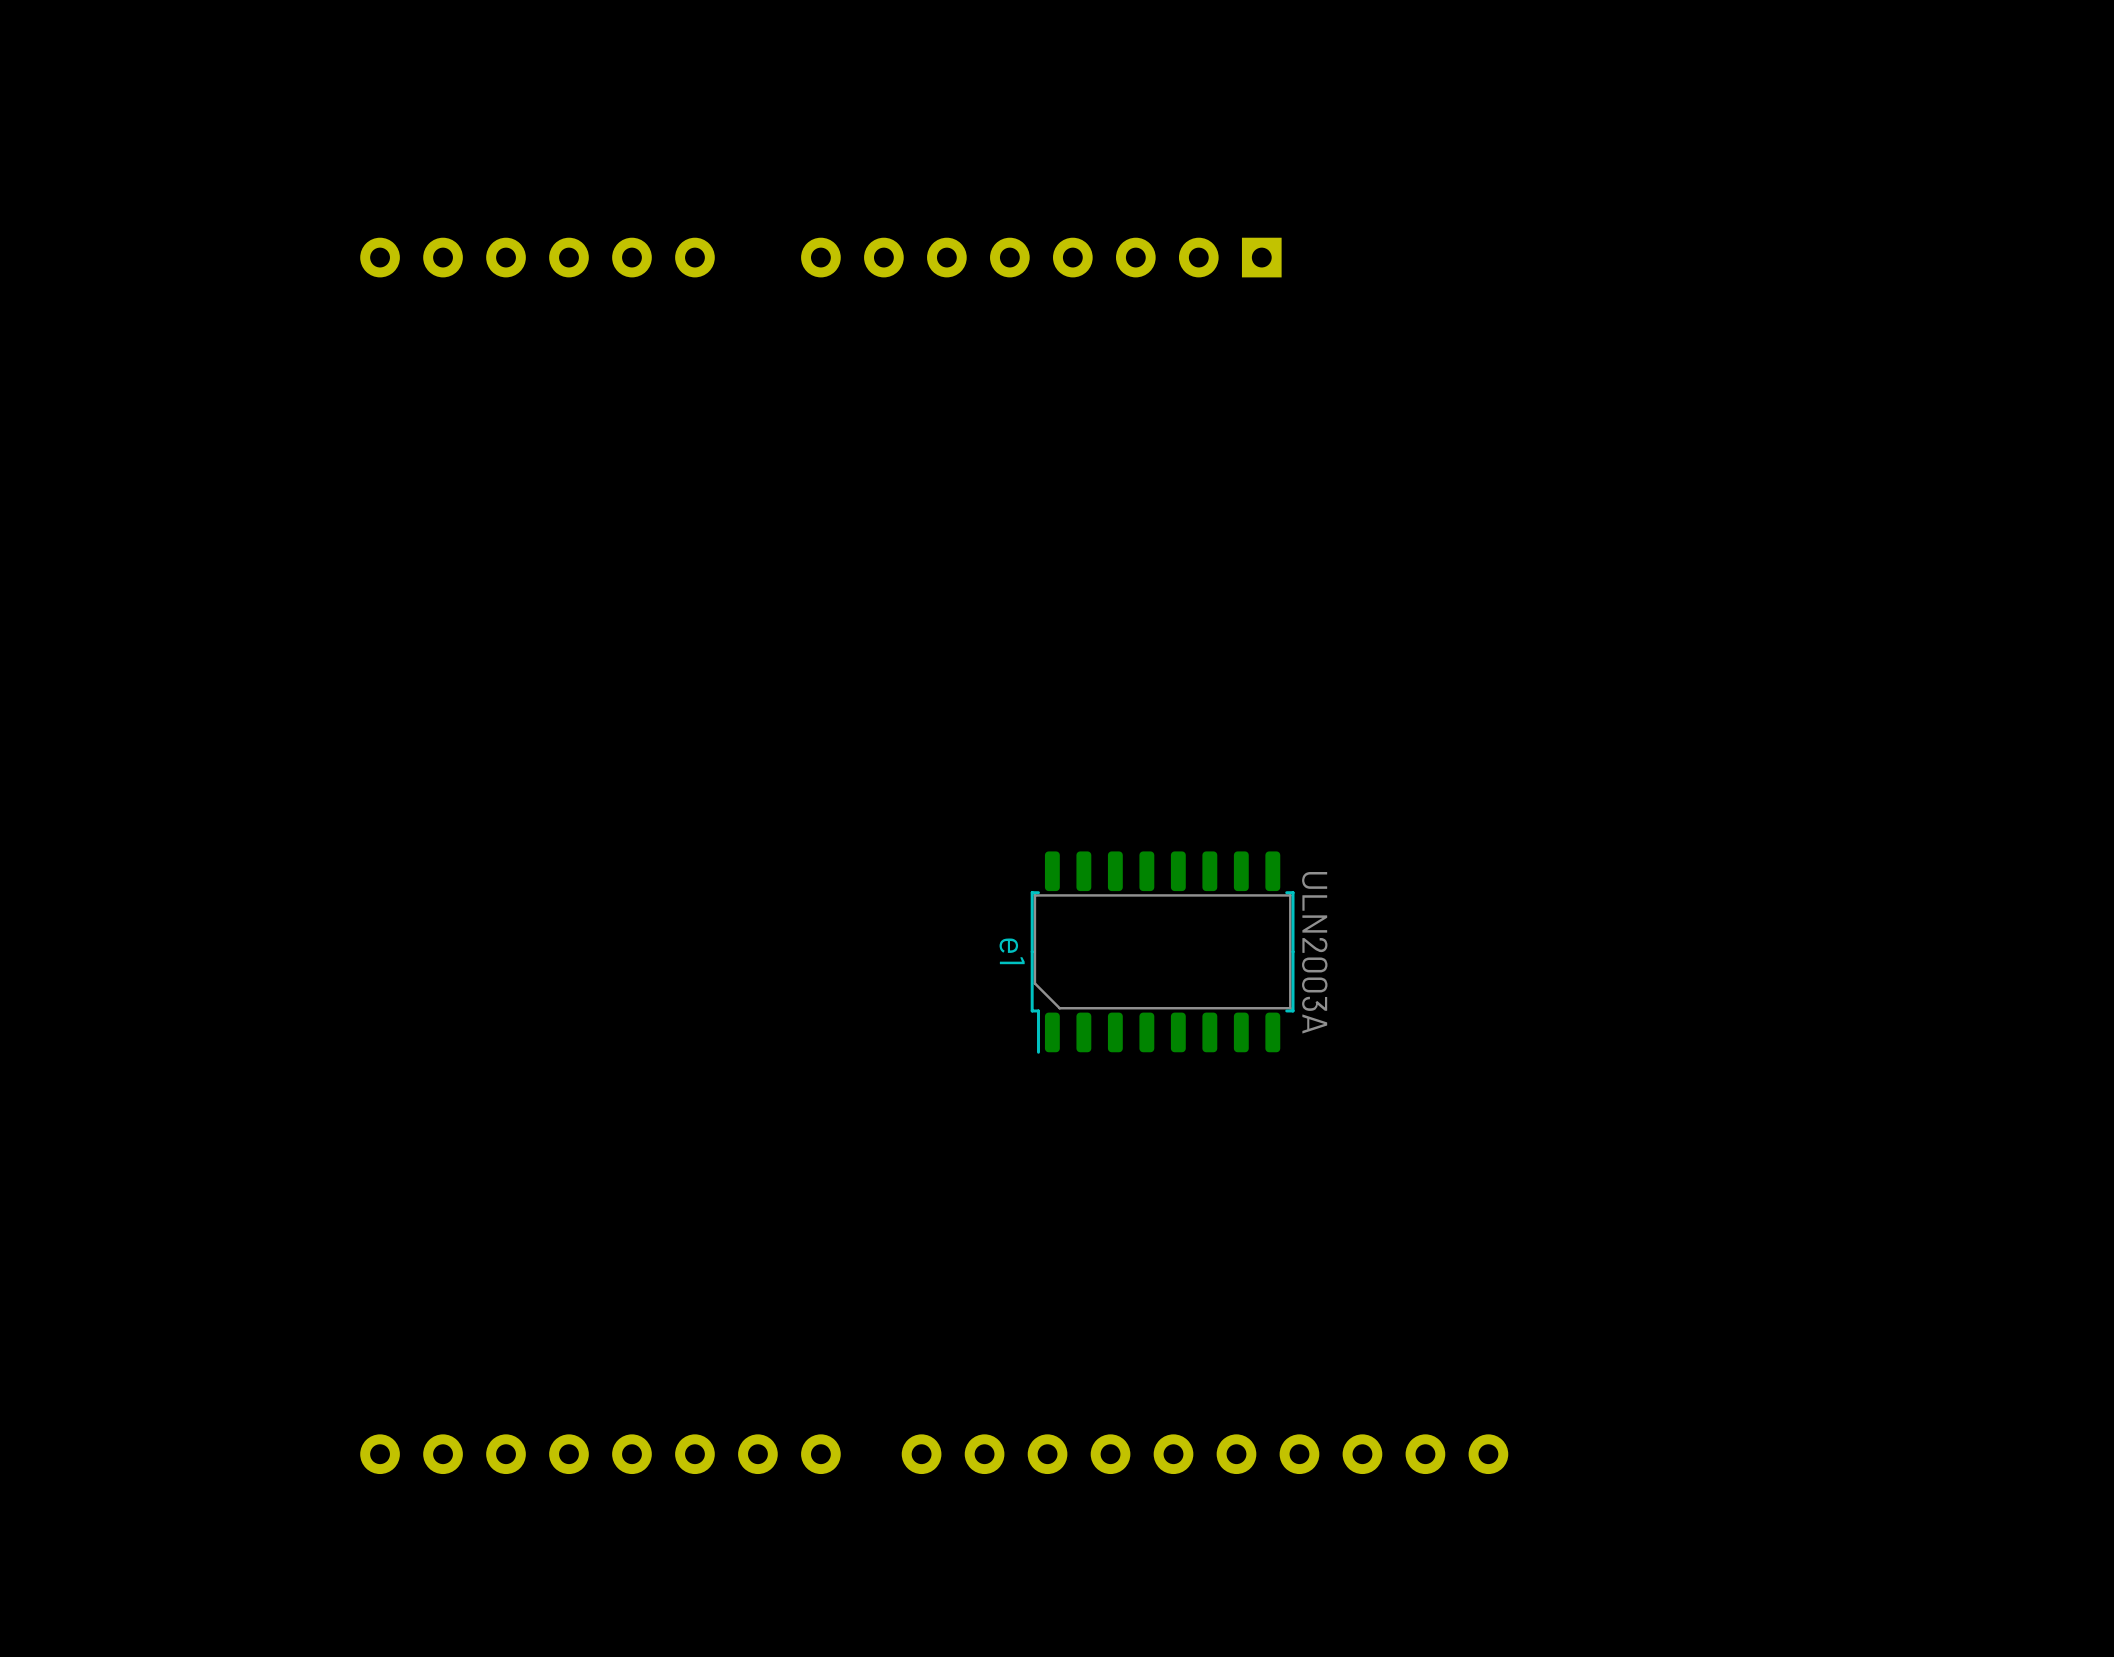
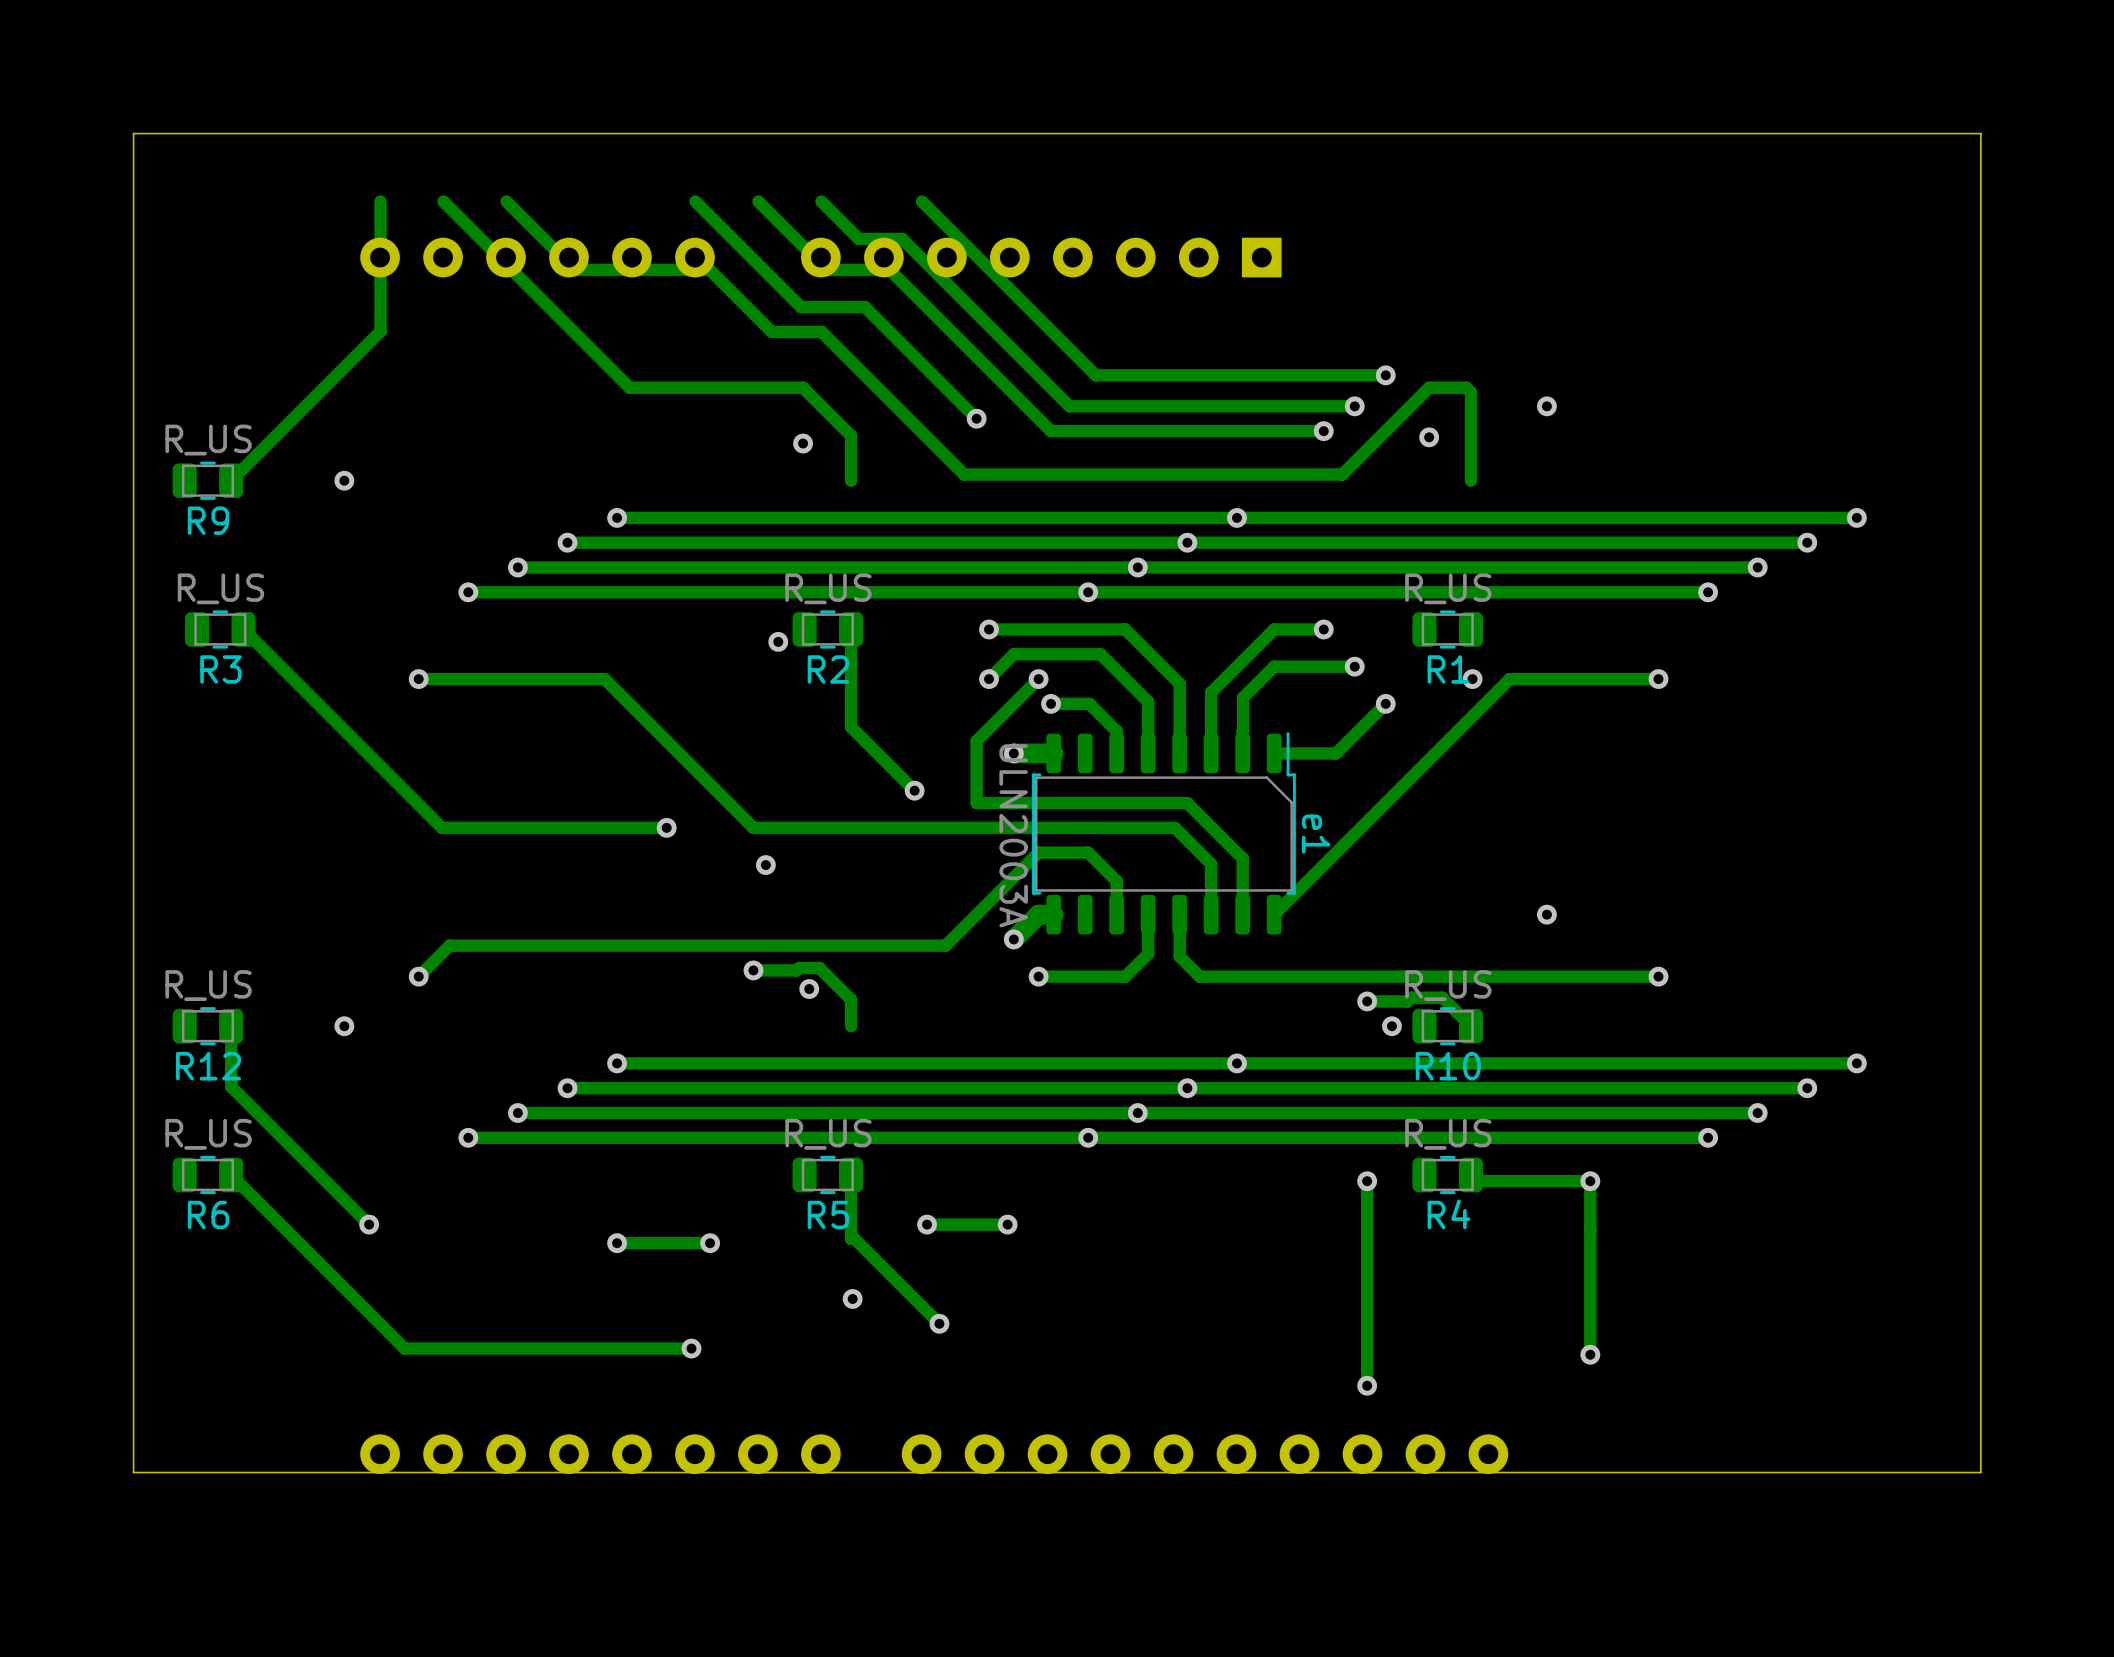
board edge: none -> (1980, 133) (1980, 1472) (133, 1472) (133, 133) (1980, 133)
track: none -> (380, 201) (380, 331) (231, 480)
track: none -> (443, 201) (629, 387) (803, 387) (851, 435) (851, 480)
track: none -> (506, 201) (574, 269) (709, 269) (771, 331) (821, 331) (964, 474) (1342, 474) (1429, 387) (1466, 387) (1470, 392) (1470, 480)
track: none -> (695, 201) (801, 307) (865, 307) (976, 418)
track: none -> (758, 201) (826, 269) (889, 269) (1051, 431) (1323, 431)
track: none -> (821, 201) (858, 238) (902, 238) (1069, 406) (1354, 406)
track: none -> (922, 201) (1095, 375) (1385, 375)
via: none -> (1385, 375)
via: none -> (1354, 406)
via: none -> (1546, 406)
via: none -> (976, 418)
via: none -> (1323, 431)
via: none -> (1429, 437)
via: none -> (803, 443)
R9: none -> R_US (207, 480)
via: none -> (344, 480)
via: none -> (617, 517)
via: none -> (1236, 517)
track: none -> (1856, 517) (617, 517)
via: none -> (1856, 517)
via: none -> (567, 542)
via: none -> (1187, 542)
track: none -> (1807, 542) (567, 542)
via: none -> (1807, 542)
via: none -> (517, 567)
via: none -> (1137, 567)
track: none -> (1757, 567) (517, 567)
via: none -> (1757, 567)
via: none -> (468, 592)
via: none -> (1088, 592)
track: none -> (1708, 592) (468, 592)
via: none -> (1708, 592)
R3: none -> R_US (220, 629)
track: none -> (243, 629) (441, 827) (666, 827)
R2: none -> R_US (827, 629)
track: none -> (851, 629) (851, 727) (914, 790)
track: none -> (989, 629) (1125, 629) (1179, 683) (1179, 753)
via: none -> (989, 629)
track: none -> (1323, 629) (1274, 629) (1211, 692) (1211, 753)
via: none -> (1323, 629)
R1: none -> R_US (1447, 629)
via: none -> (778, 641)
track: none -> (1354, 666) (1274, 666) (1243, 697) (1242, 753)
via: none -> (1354, 666)
track: none -> (418, 679) (604, 679) (753, 827) (1174, 827) (1211, 864) (1211, 914)
via: none -> (418, 679)
track: none -> (989, 679) (1013, 654) (1100, 654) (1148, 701) (1148, 753)
via: none -> (989, 679)
track: none -> (1038, 679) (976, 741) (976, 803) (1187, 803) (1242, 858) (1242, 914)
via: none -> (1038, 679)
via: none -> (1472, 679)
track: none -> (1658, 679) (1509, 679) (1274, 914)
via: none -> (1658, 679)
track: none -> (1051, 703) (1089, 703) (1116, 731) (1116, 753)
via: none -> (1051, 703)
track: none -> (1385, 703) (1336, 753) (1274, 753)
via: none -> (1385, 703)
via: none -> (1013, 753)
track: none -> (1053, 753) (1013, 753)
via: none -> (914, 790)
via: none -> (666, 827)
via: none -> (765, 865)
track: none -> (1053, 914) (1038, 914) (1013, 939)
track: none -> (1116, 914) (1116, 881) (1088, 852) (1038, 852) (945, 945) (449, 945) (418, 976)
track: none -> (1148, 914) (1148, 953) (1125, 976) (1038, 976)
track: none -> (1179, 914) (1179, 956) (1199, 976) (1658, 976)
via: none -> (1546, 914)
via: none -> (1013, 939)
e1 rotation: 0° (1162, 952) -> 180° (1163, 833)
track: none -> (753, 970) (796, 970) (799, 967) (819, 967) (851, 999) (851, 1026)
via: none -> (753, 970)
via: none -> (418, 976)
via: none -> (1038, 976)
via: none -> (1658, 976)
via: none -> (809, 989)
track: none -> (1367, 1001) (1407, 1001) (1411, 997) (1442, 997) (1470, 1026)
via: none -> (1367, 1001)
R12: none -> R_US (207, 1026)
track: none -> (231, 1026) (231, 1086) (369, 1224)
via: none -> (344, 1026)
via: none -> (1391, 1026)
R10: none -> R_US (1447, 1026)
via: none -> (617, 1063)
via: none -> (1236, 1063)
track: none -> (1856, 1063) (617, 1063)
via: none -> (1856, 1063)
via: none -> (567, 1088)
via: none -> (1187, 1088)
track: none -> (1807, 1088) (567, 1088)
via: none -> (1807, 1088)
via: none -> (517, 1113)
via: none -> (1137, 1113)
track: none -> (1757, 1113) (517, 1113)
via: none -> (1757, 1113)
via: none -> (468, 1137)
via: none -> (1088, 1137)
track: none -> (1708, 1137) (468, 1137)
via: none -> (1708, 1137)
R6: none -> R_US (207, 1174)
track: none -> (231, 1174) (404, 1348) (691, 1348)
R5: none -> R_US (827, 1174)
track: none -> (851, 1174) (851, 1238) (854, 1238) (939, 1323)
R4: none -> R_US (1447, 1174)
track: none -> (1470, 1174) (1477, 1181) (1590, 1181) (1590, 1354)
track: none -> (1367, 1181) (1367, 1385)
via: none -> (1367, 1181)
via: none -> (1590, 1181)
via: none -> (369, 1224)
via: none -> (927, 1224)
track: none -> (1007, 1224) (927, 1224)
via: none -> (1007, 1224)
via: none -> (617, 1243)
track: none -> (710, 1243) (617, 1243)
via: none -> (710, 1243)
via: none -> (852, 1298)
via: none -> (939, 1323)
via: none -> (691, 1348)
via: none -> (1590, 1354)
via: none -> (1367, 1385)

